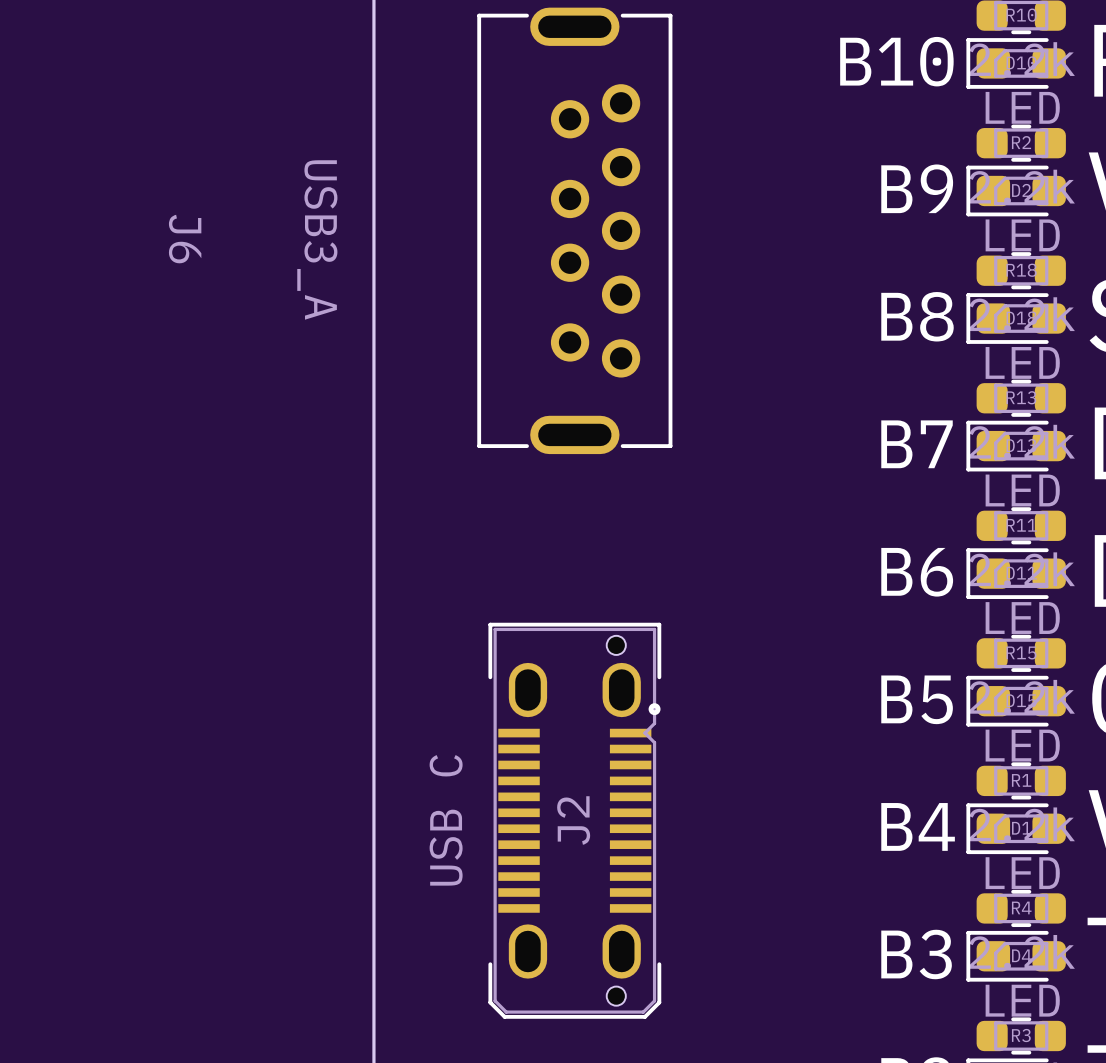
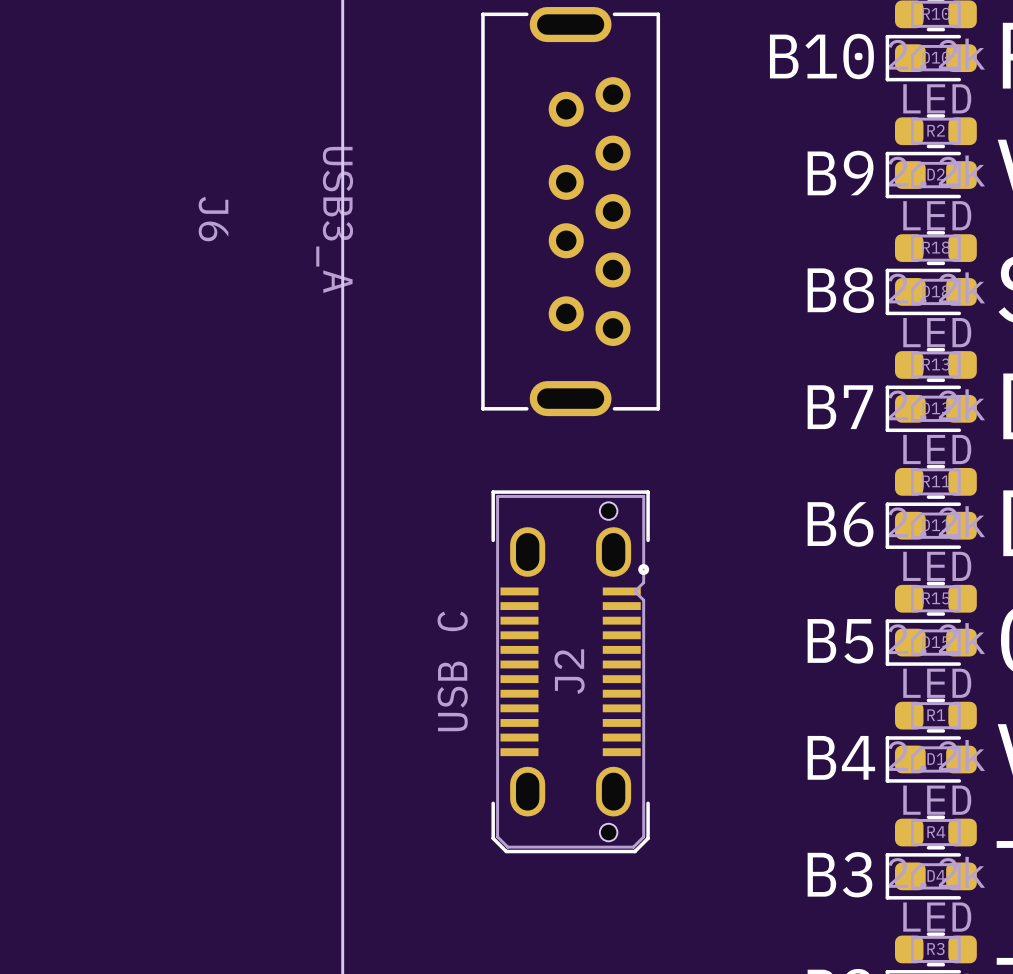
J6 position: (574, 230) -> (570, 211)
J2 position: (574, 820) -> (570, 671)

